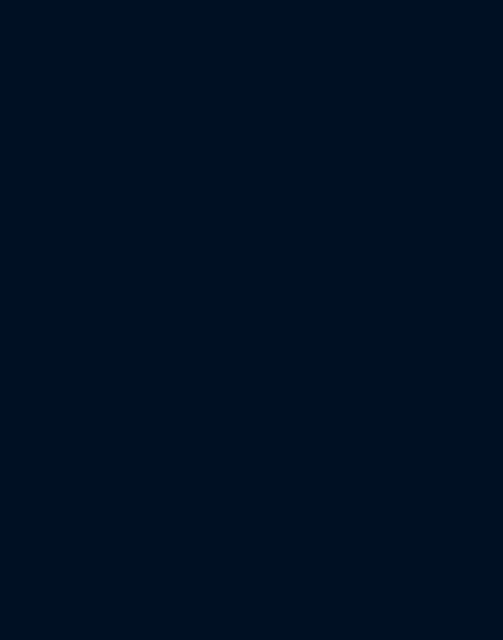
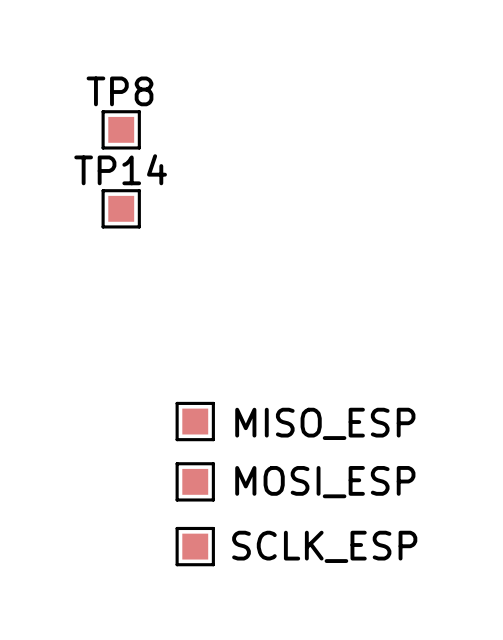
TP8: none -> (121, 129)
TP14: none -> (121, 208)
part: none -> MISO_ESP (195, 421)
part: none -> MOSI_ESP (195, 481)
part: none -> SCLK_ESP (195, 546)

